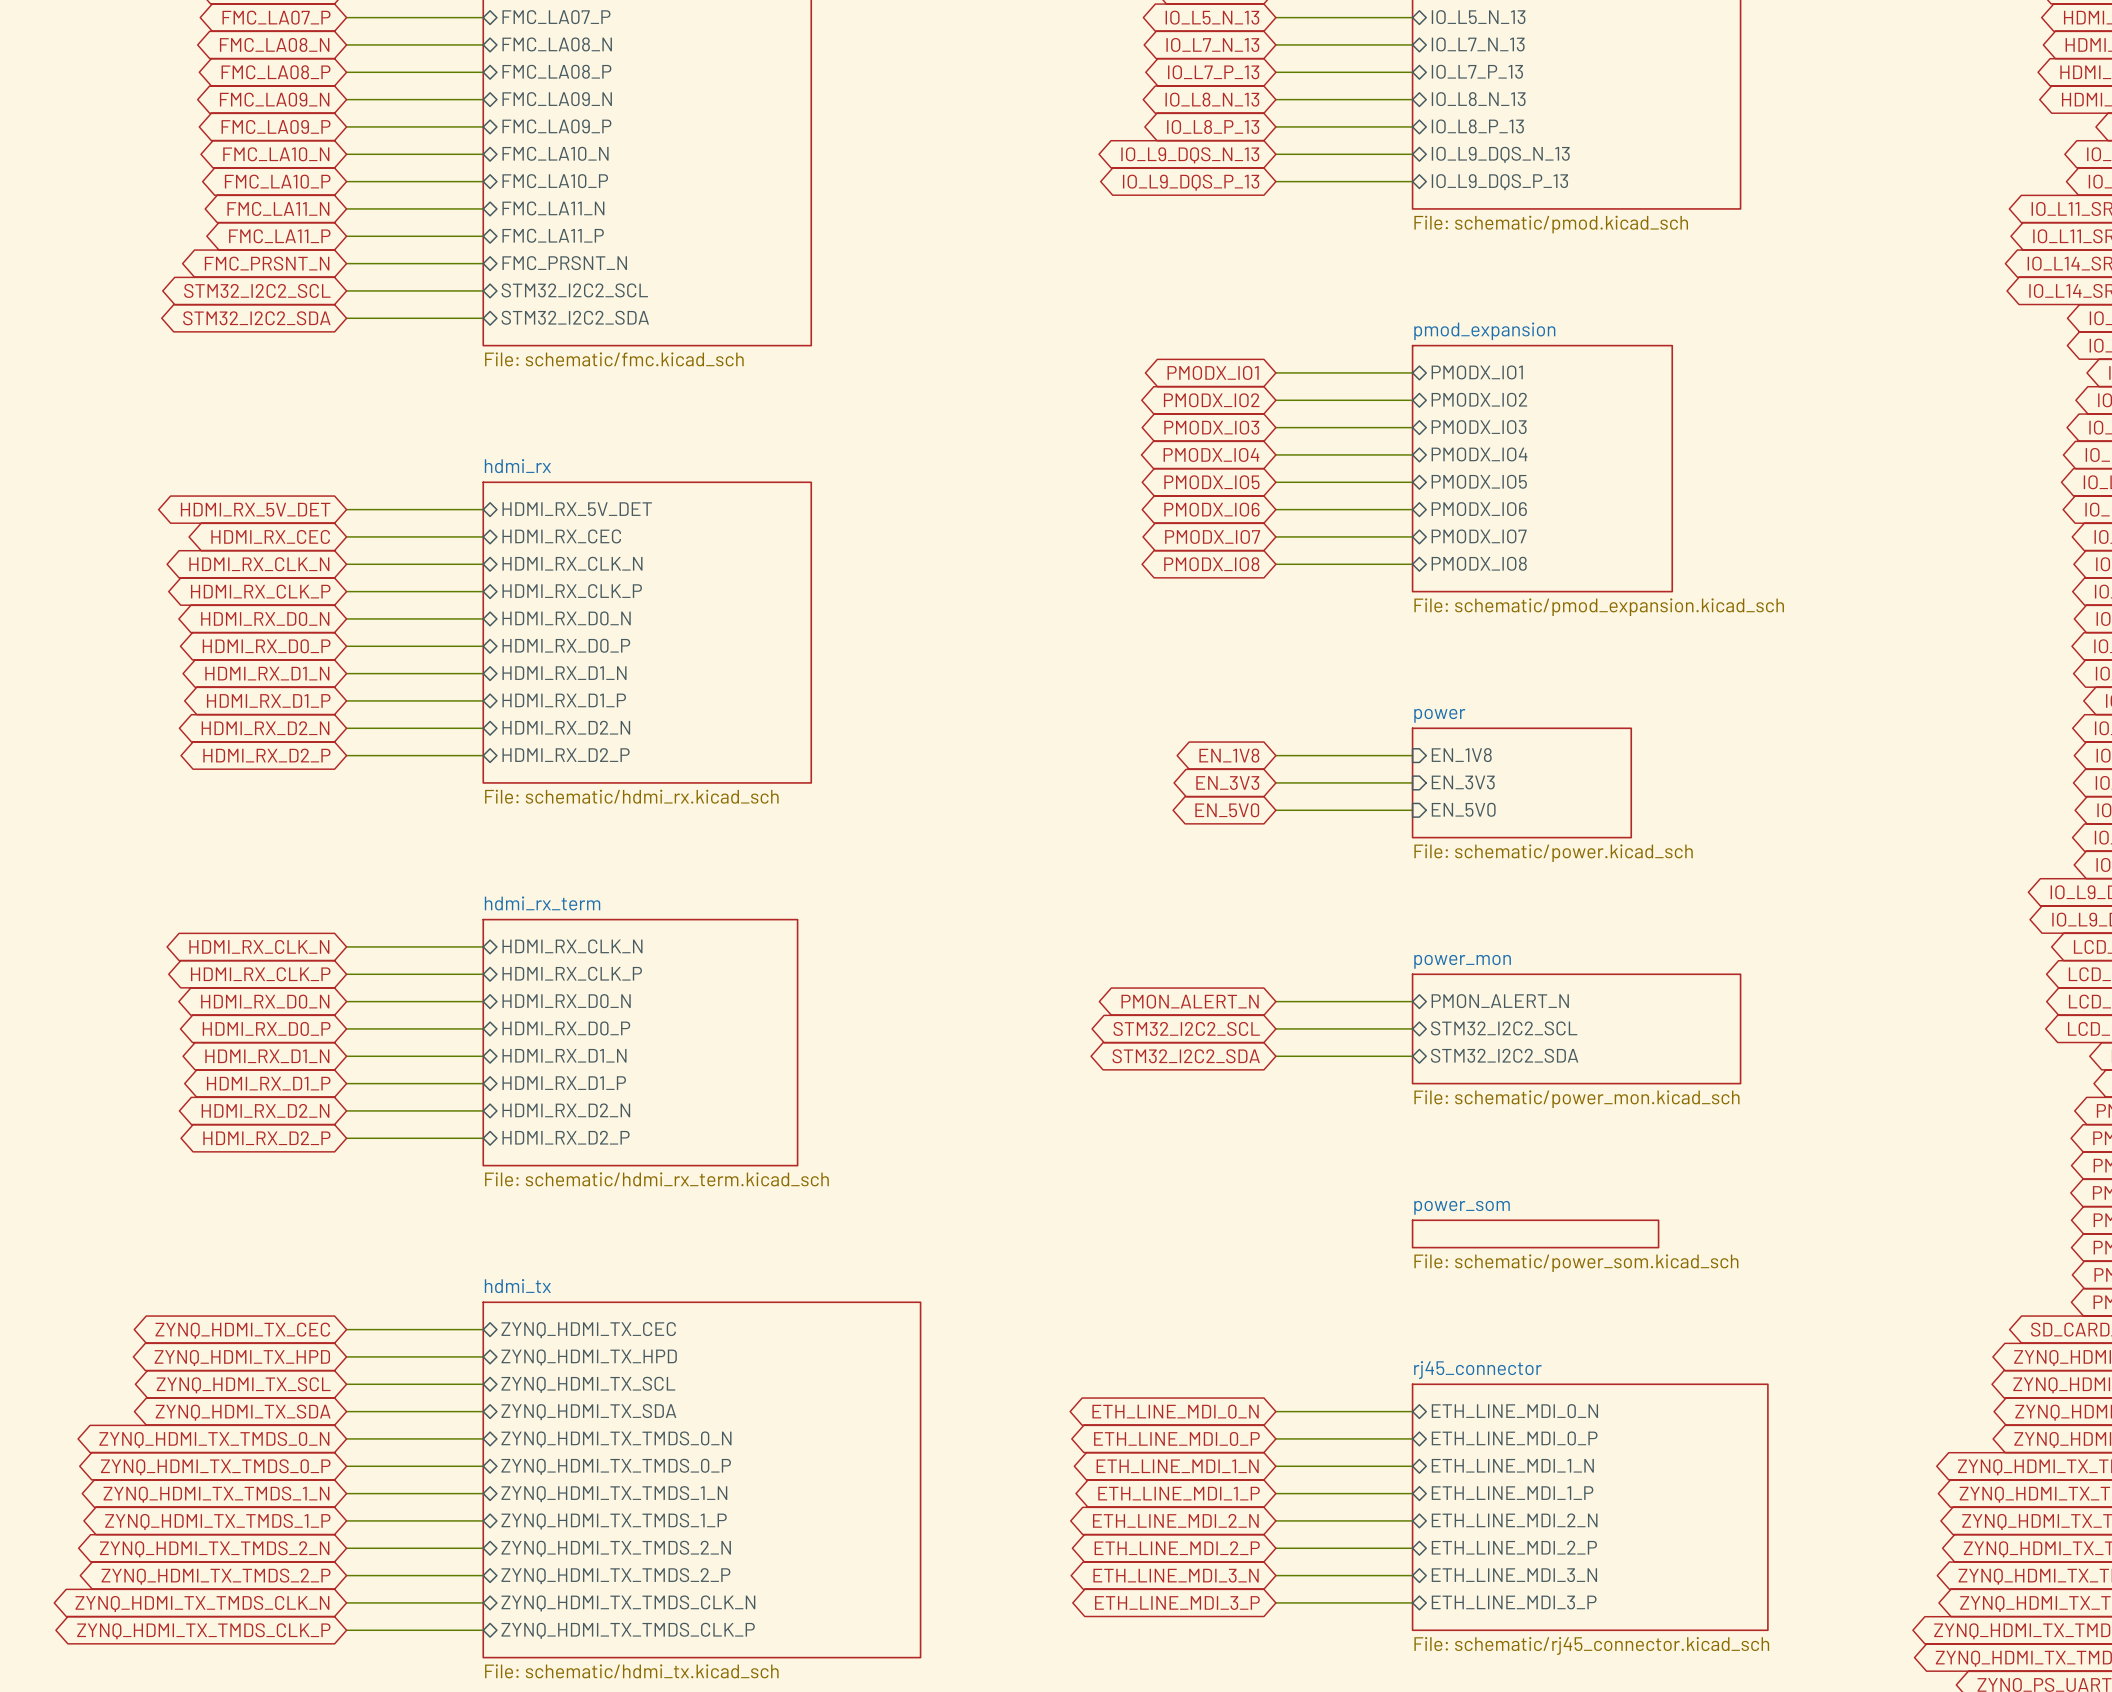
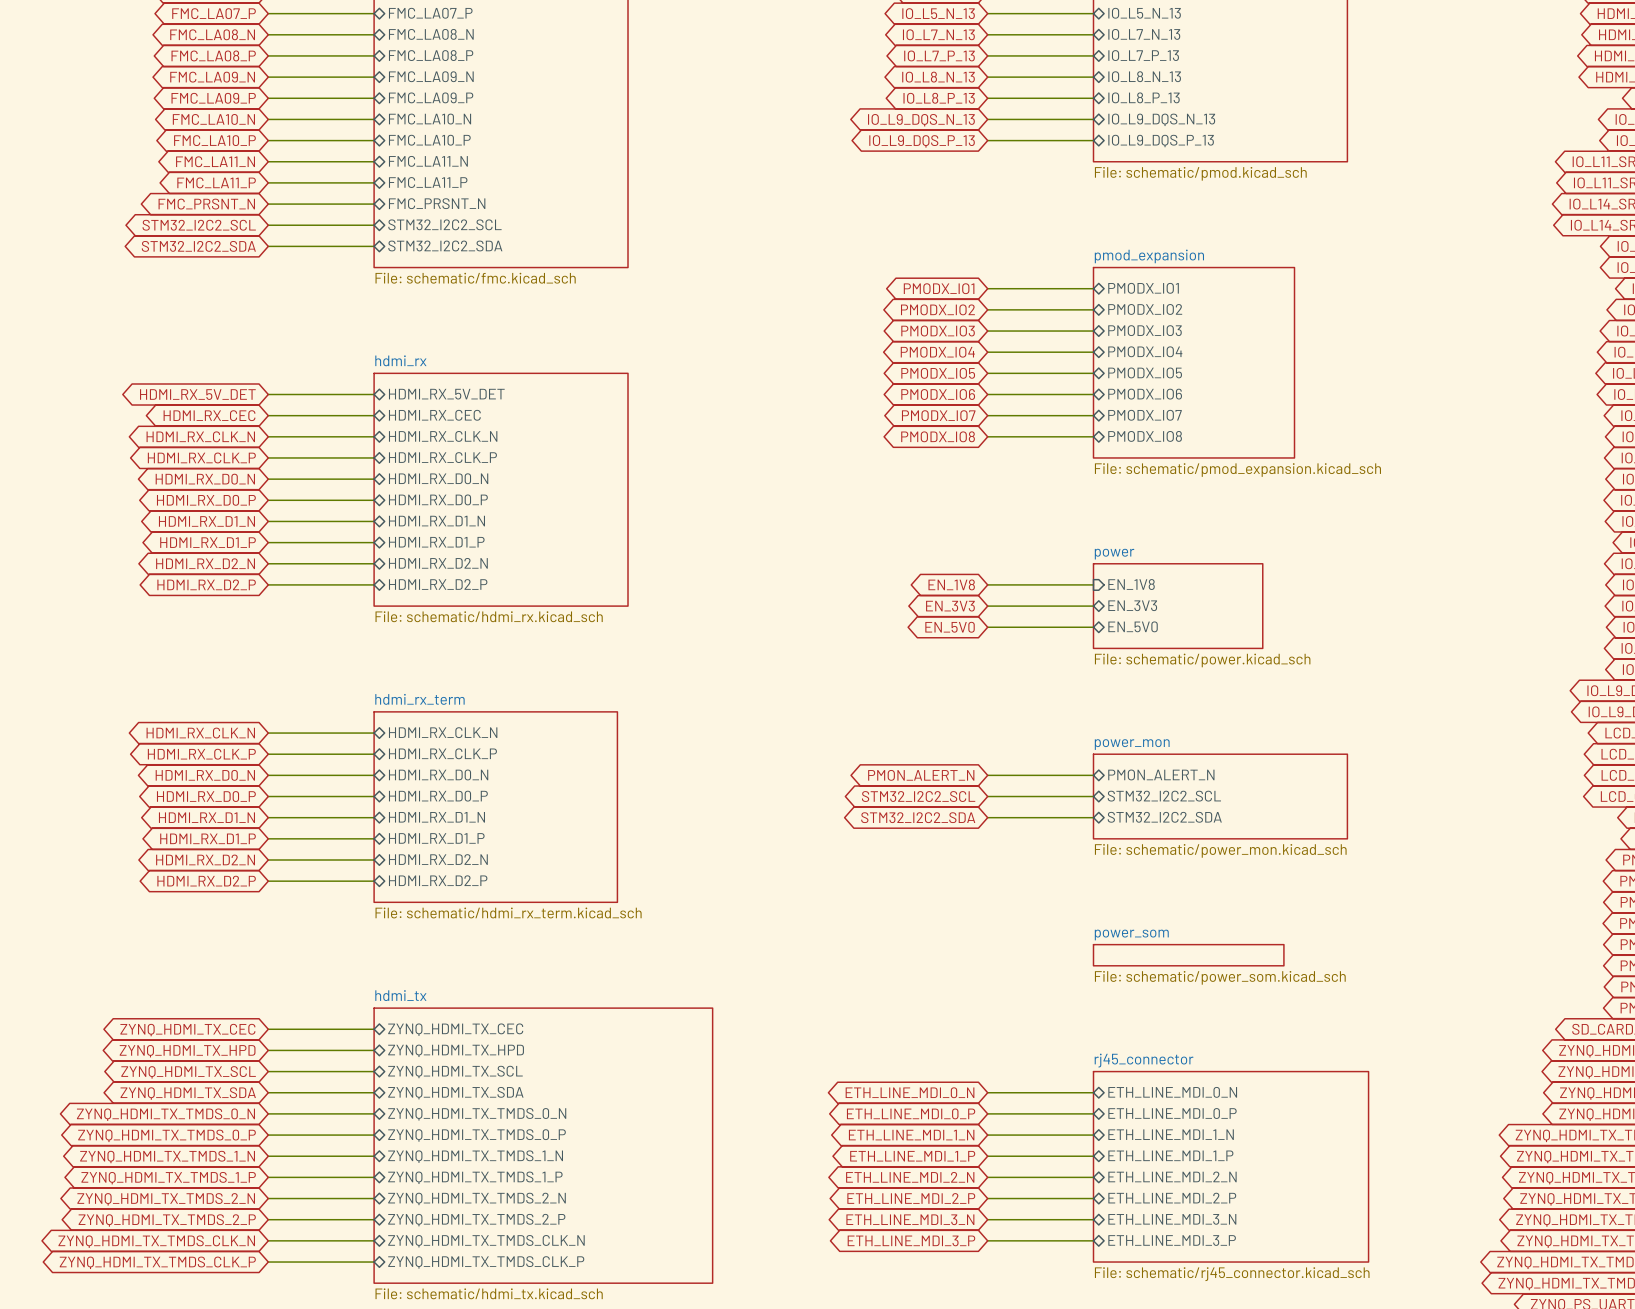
sheet pin shape: input (1463, 782) -> bidirectional (1132, 605)
sheet pin shape: input (1463, 809) -> bidirectional (1133, 626)

